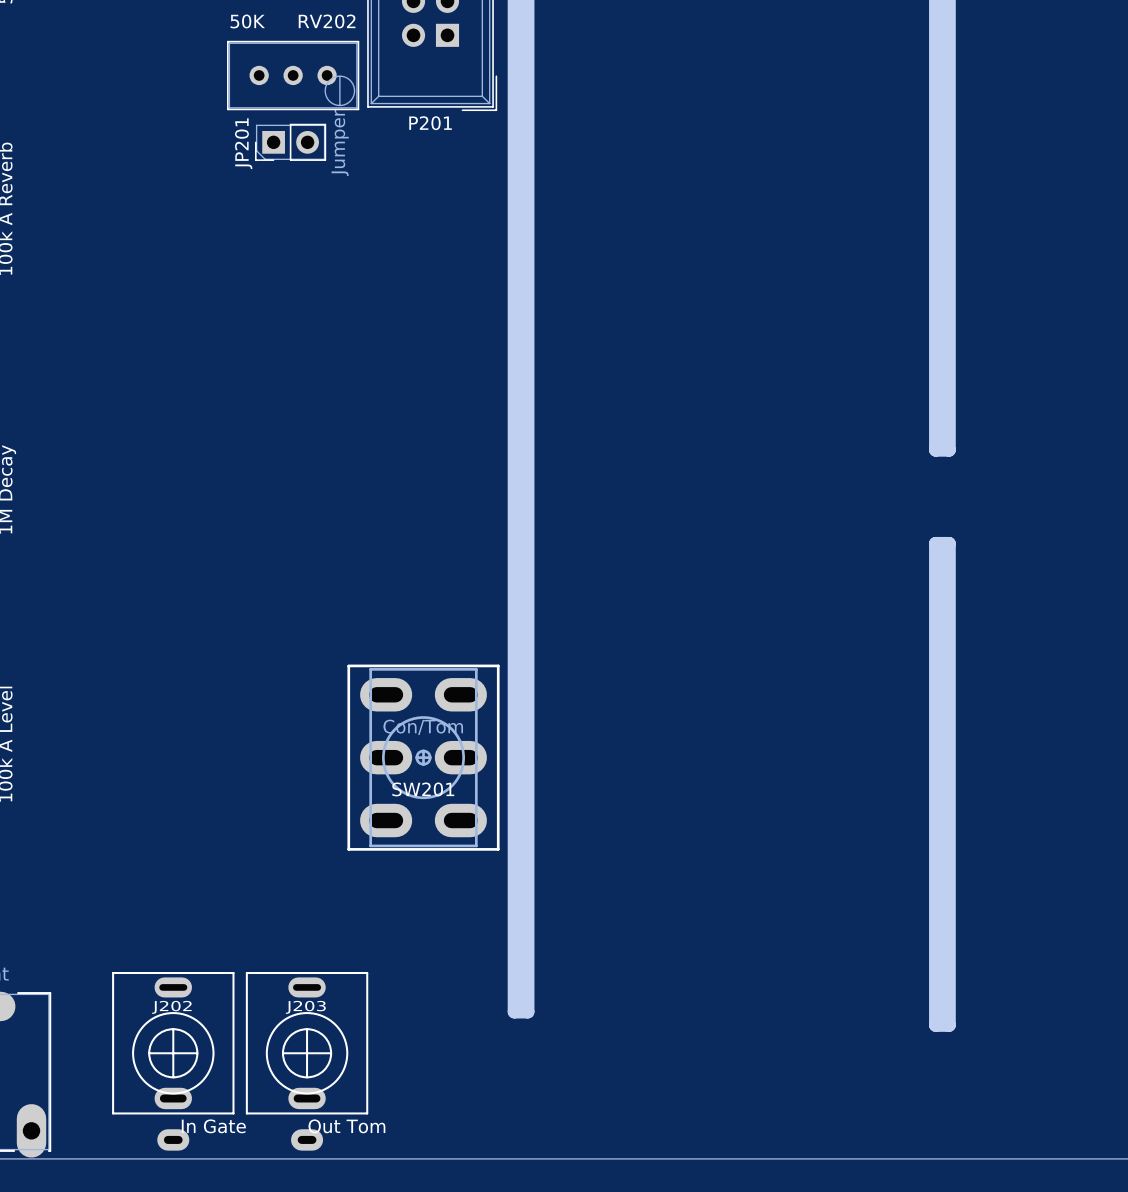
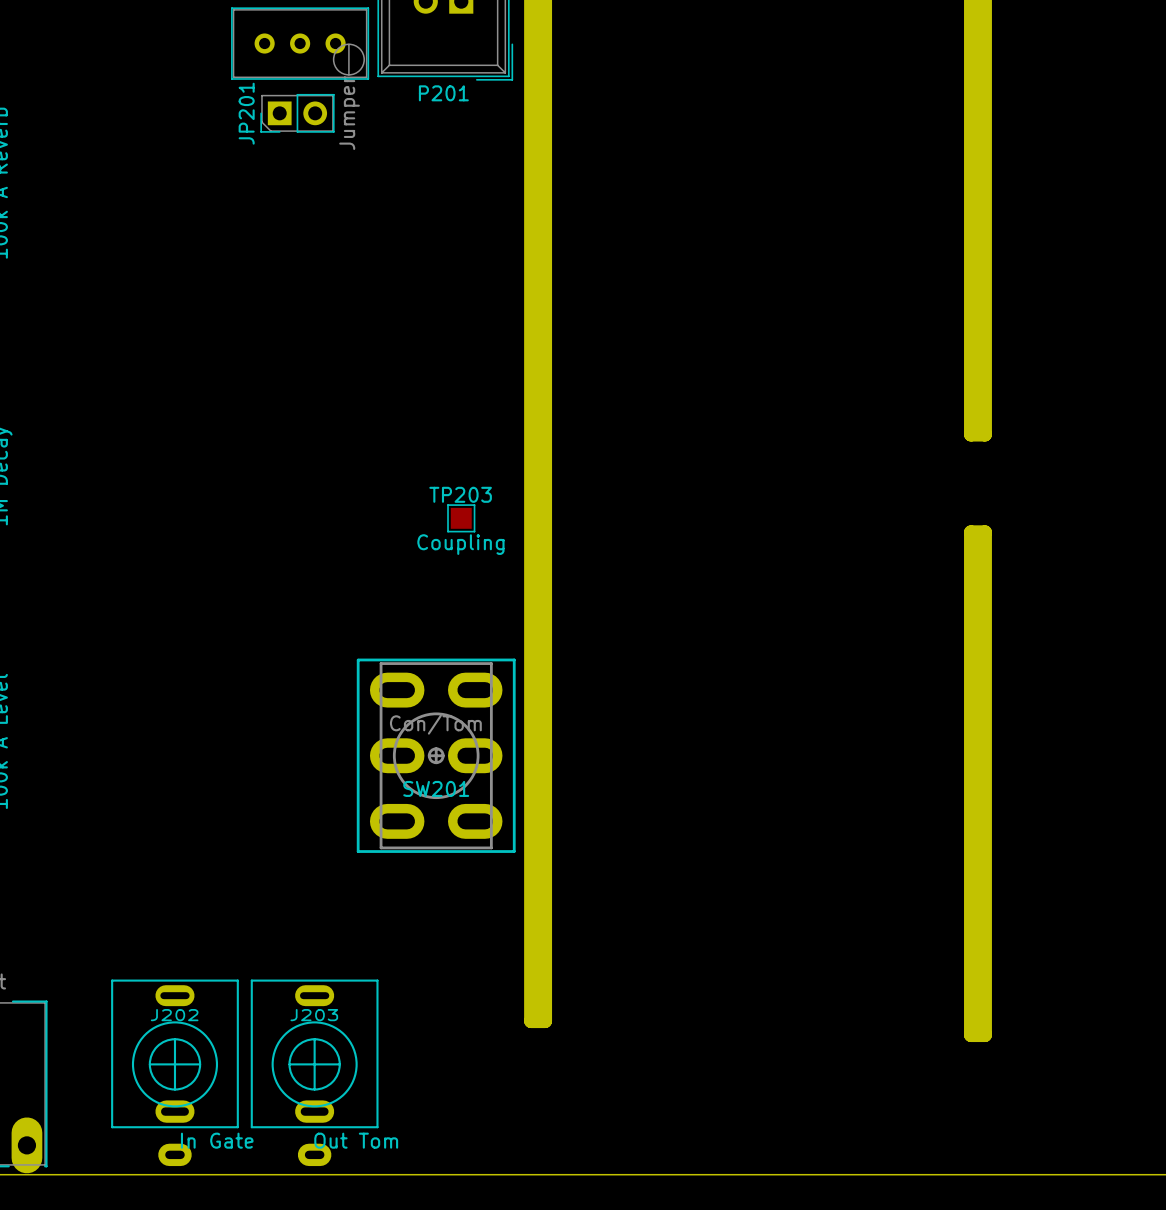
TP203: none -> Coupling (461, 518)

